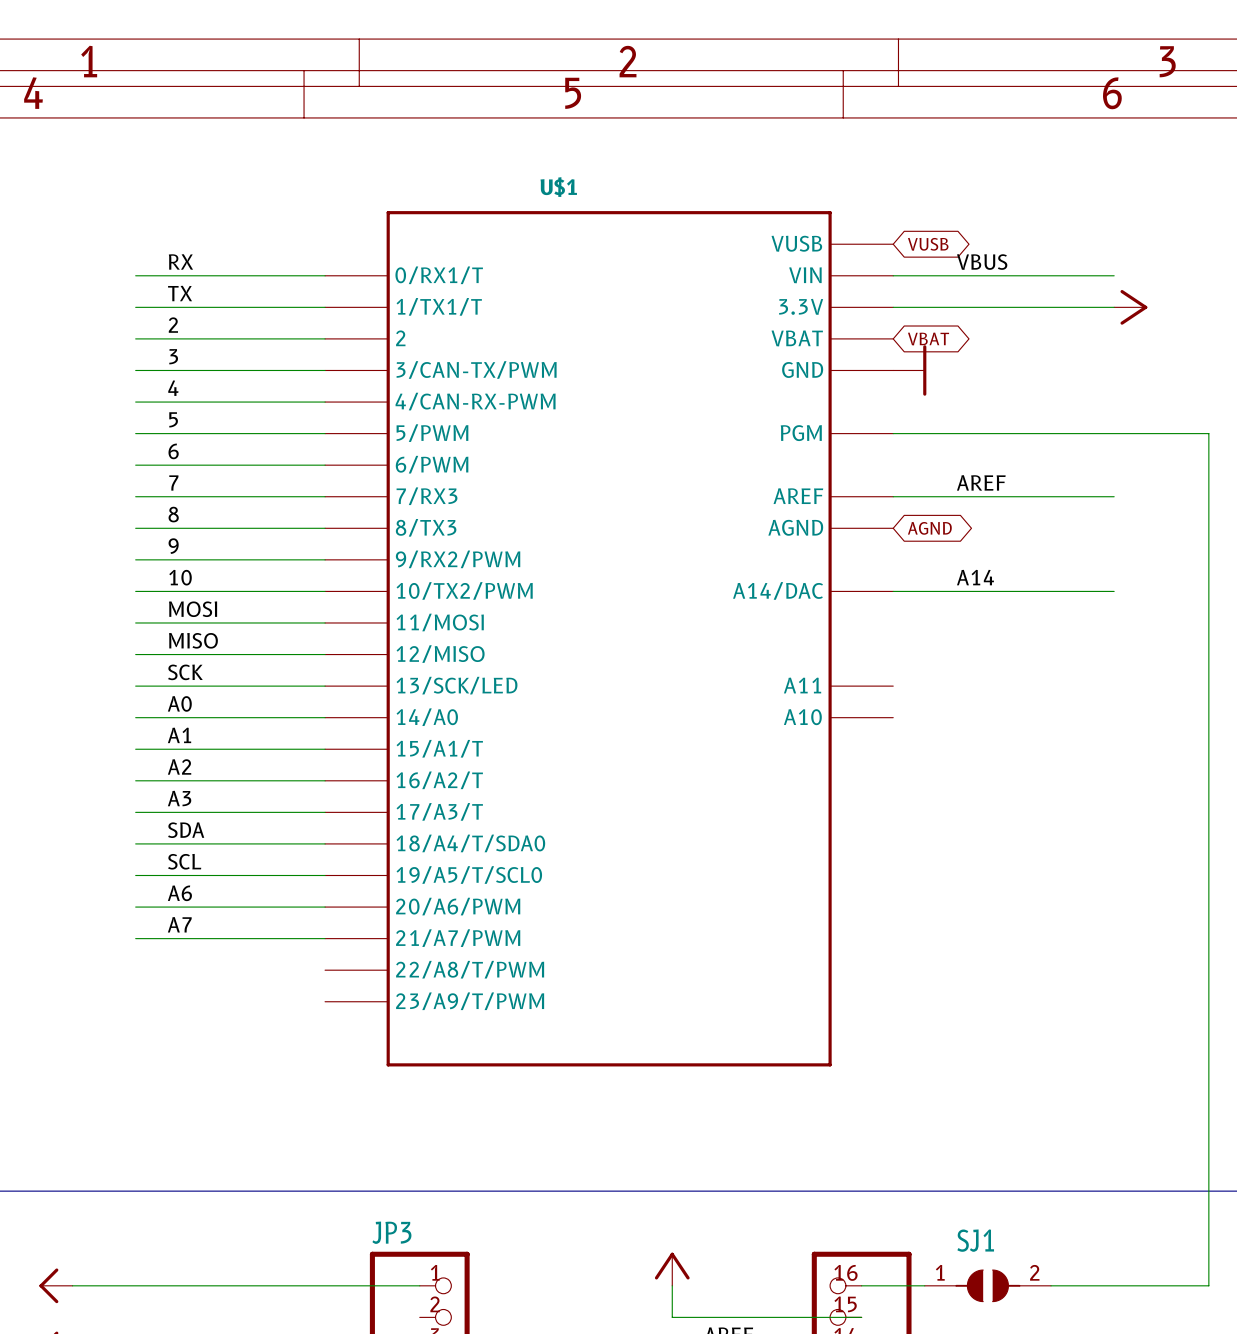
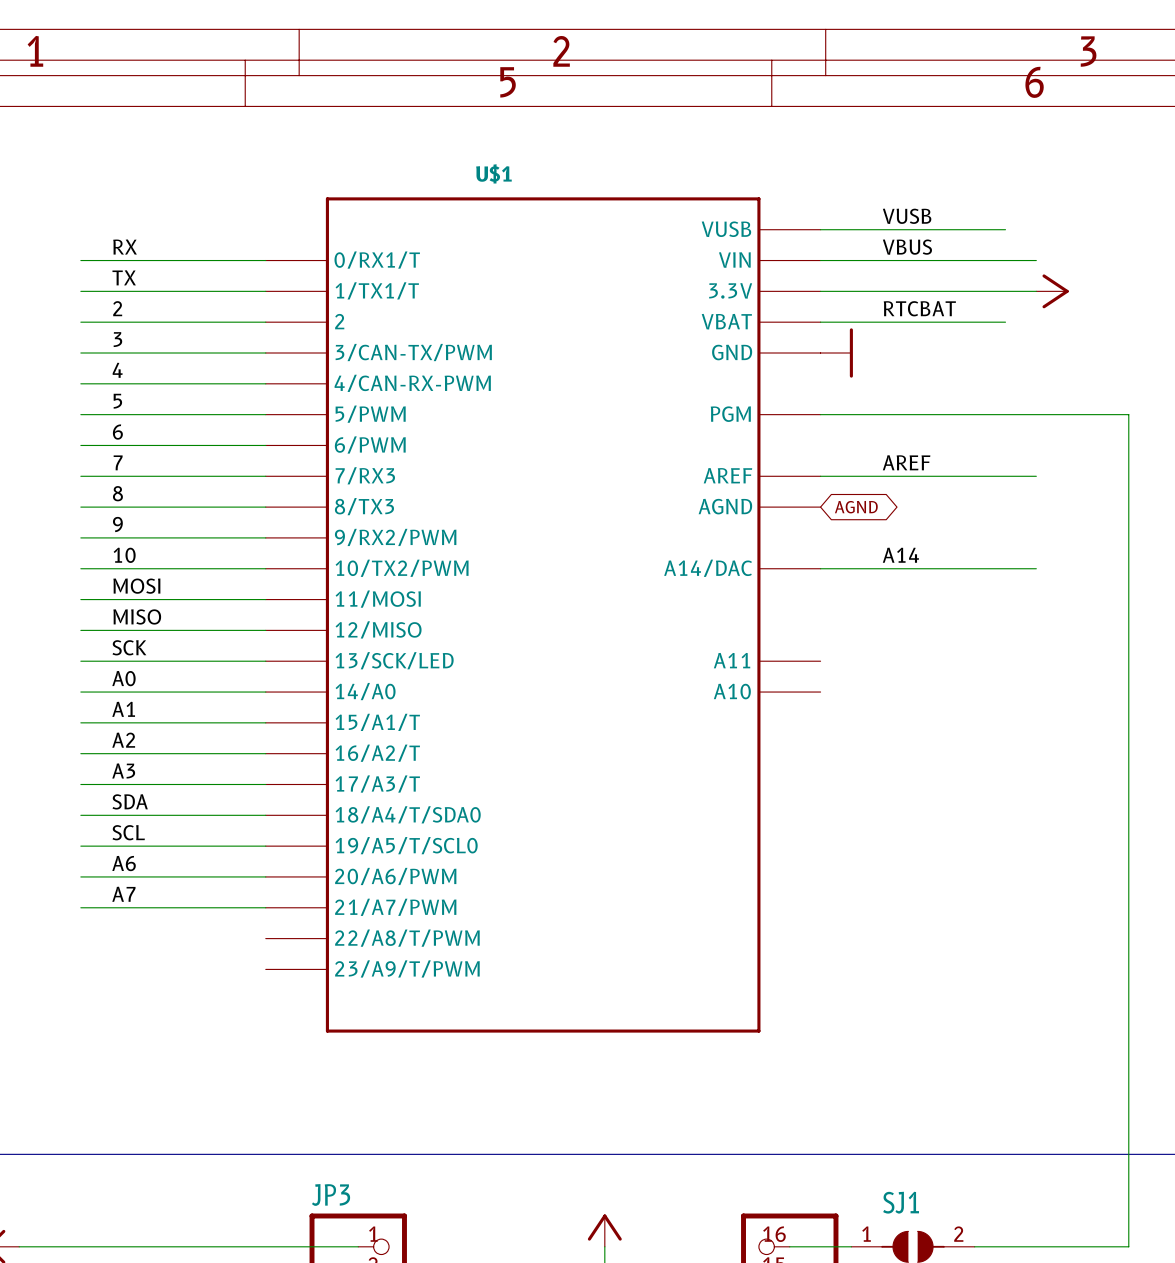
label: none -> VUSB (907, 216)
wire: none -> (820, 229) (1005, 229)
global label: VUSB (928, 244) -> none
label: none -> RTCBAT (919, 308)
wire: none -> (820, 322) (1005, 322)
global label: VBAT (928, 338) -> none

